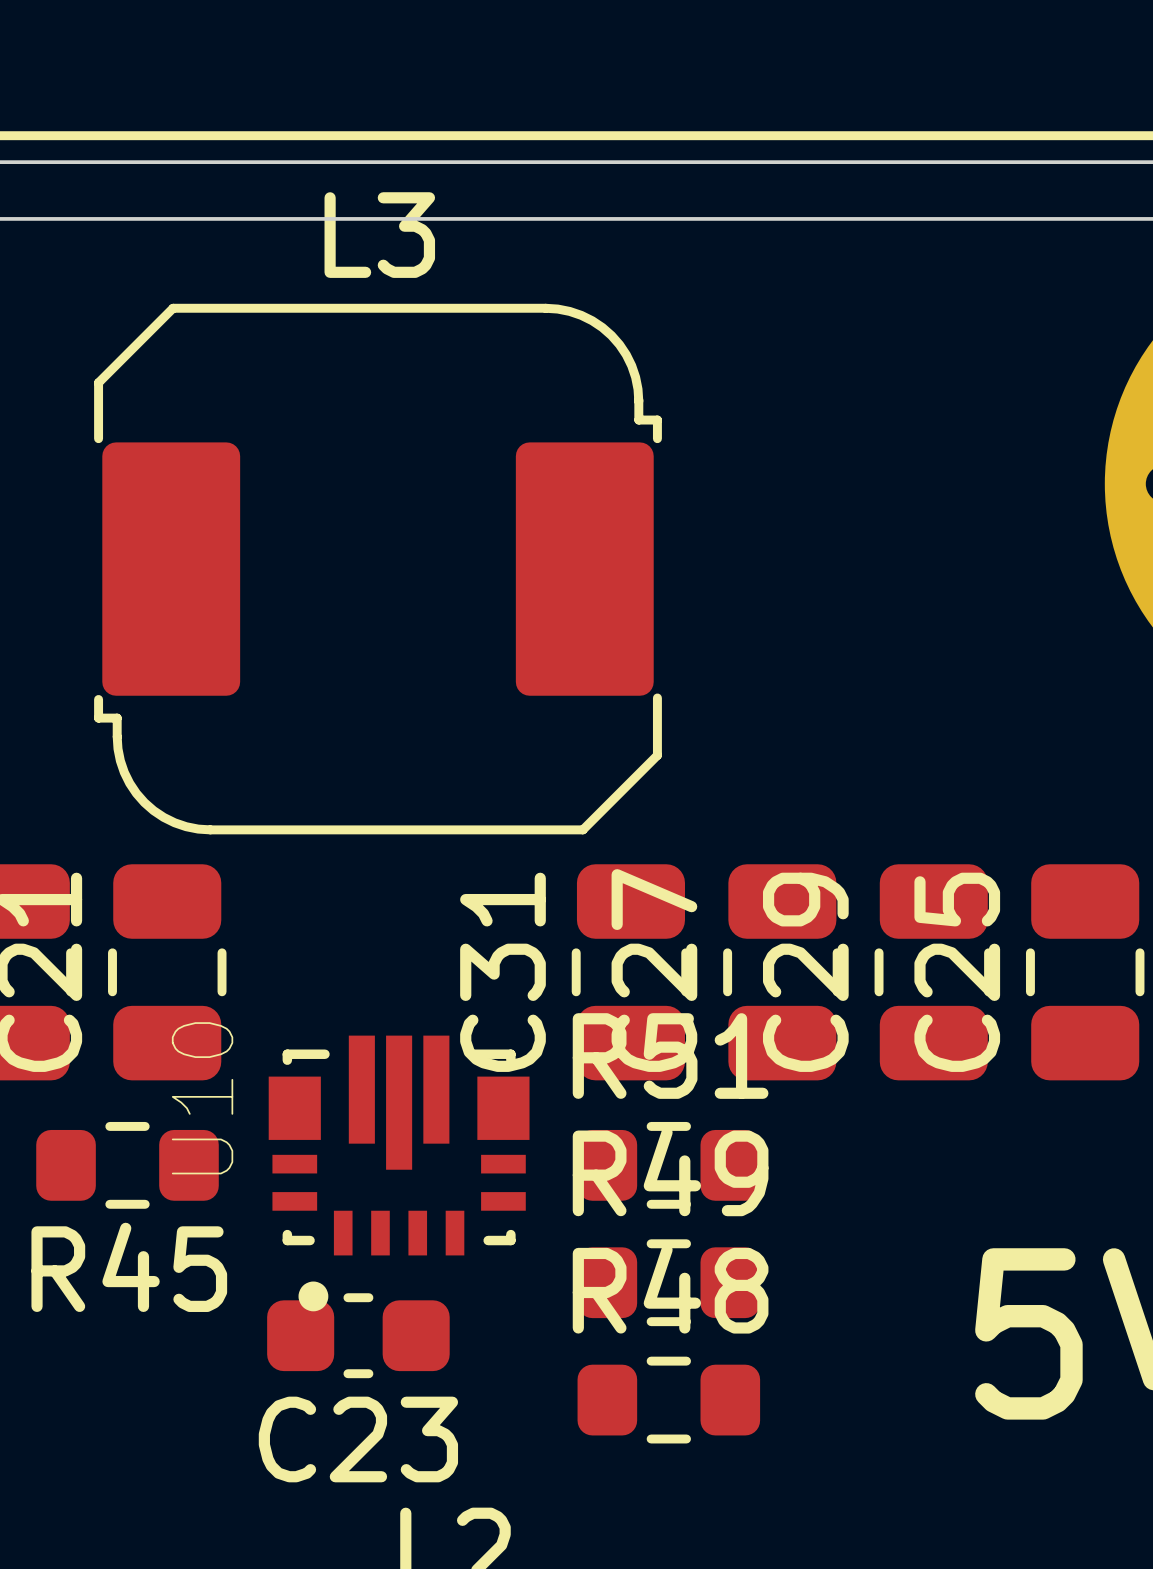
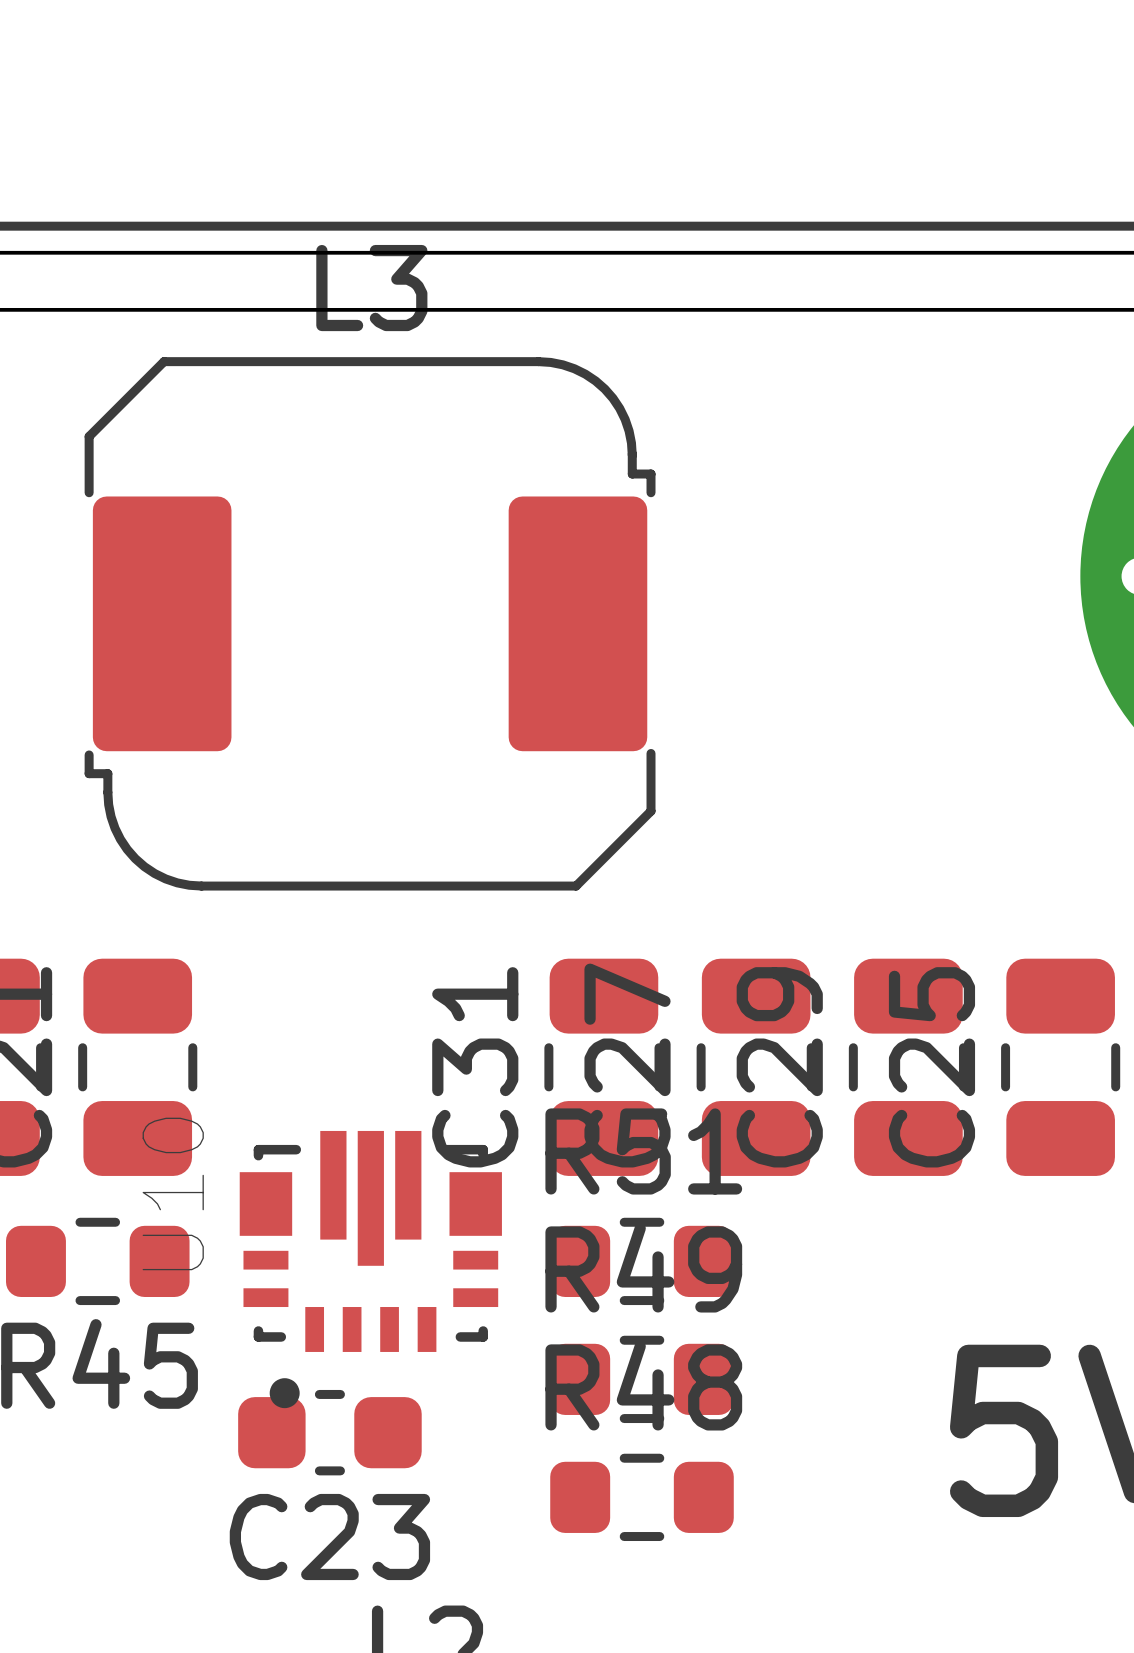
L3 position: (378, 569) -> (370, 623)

